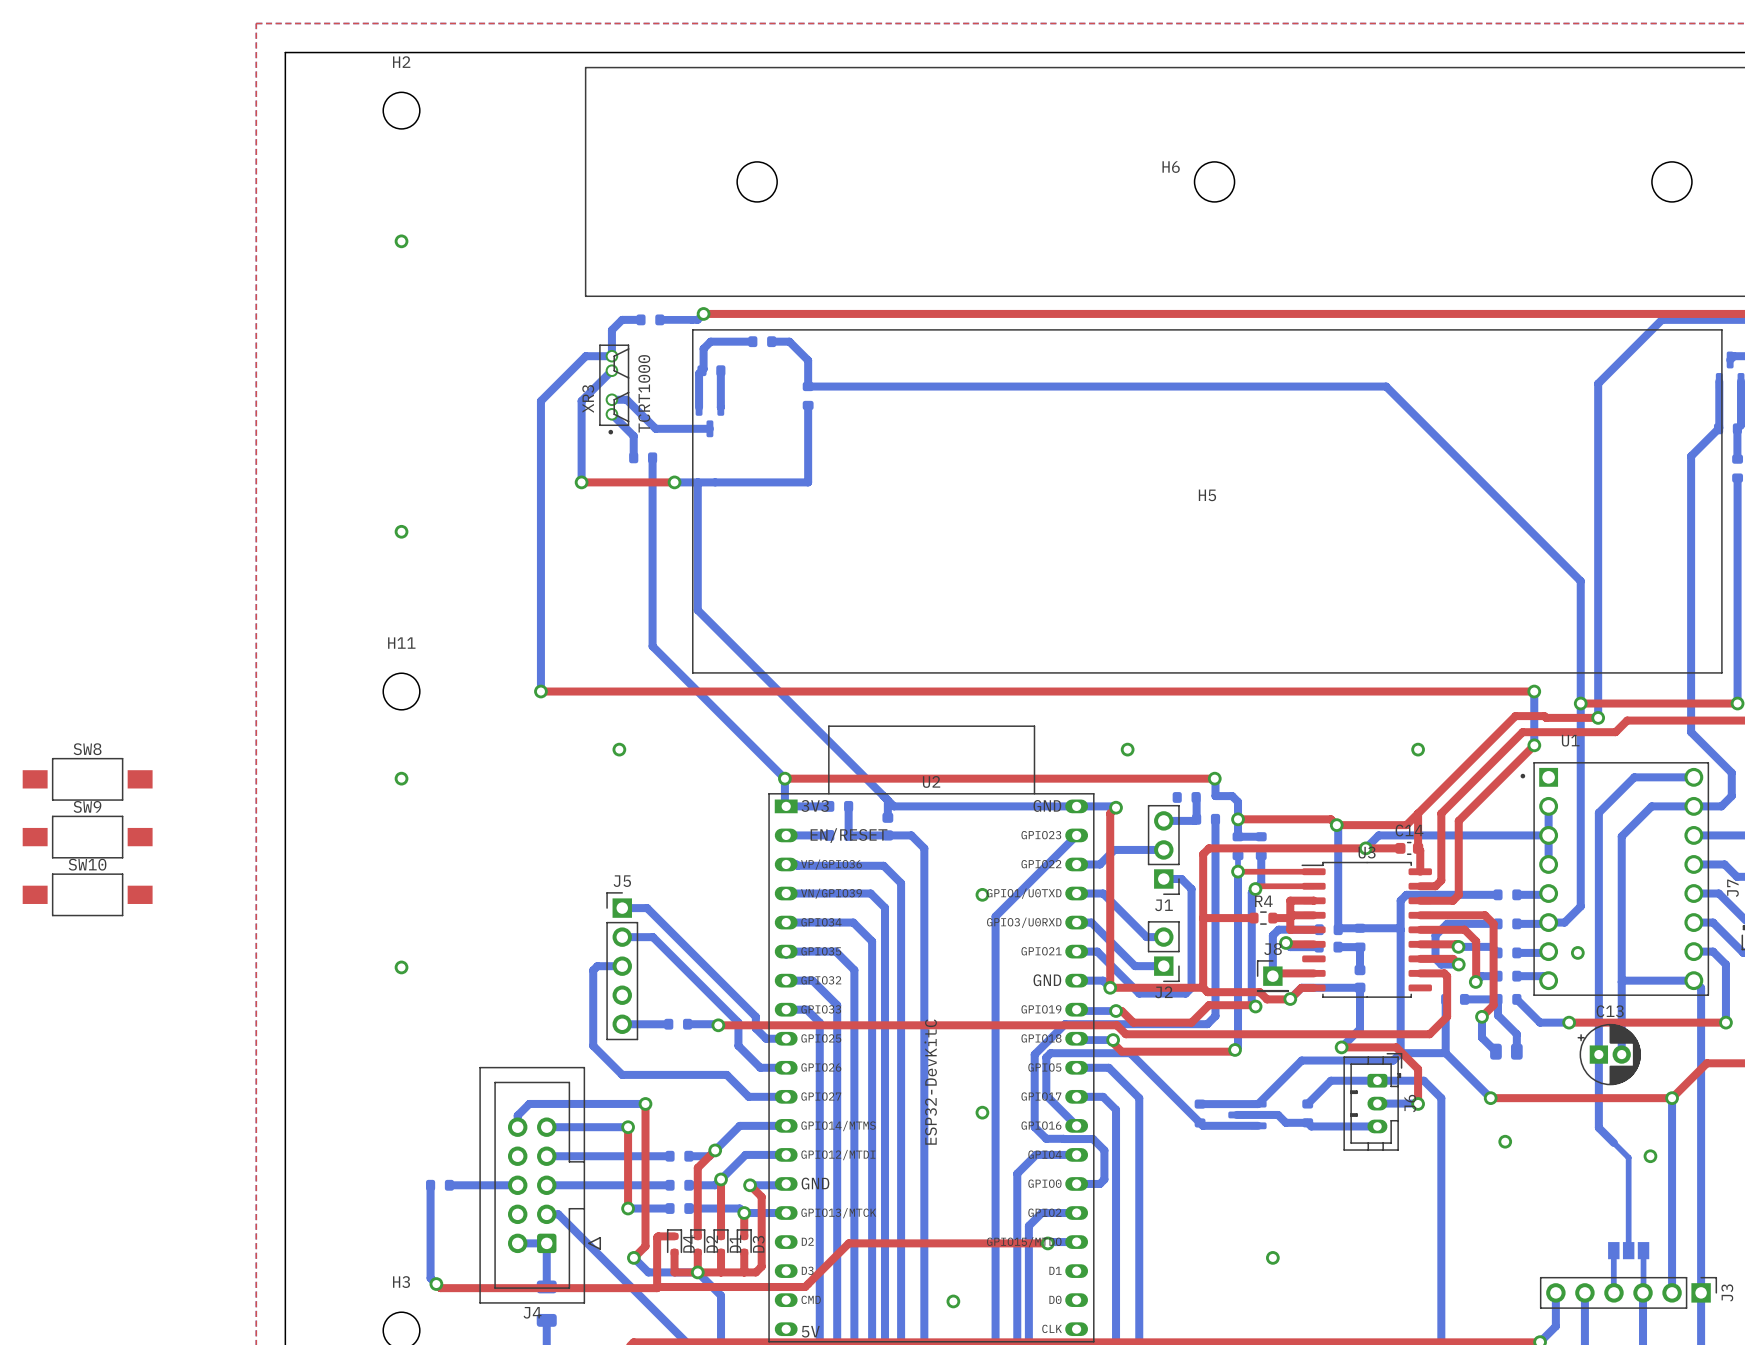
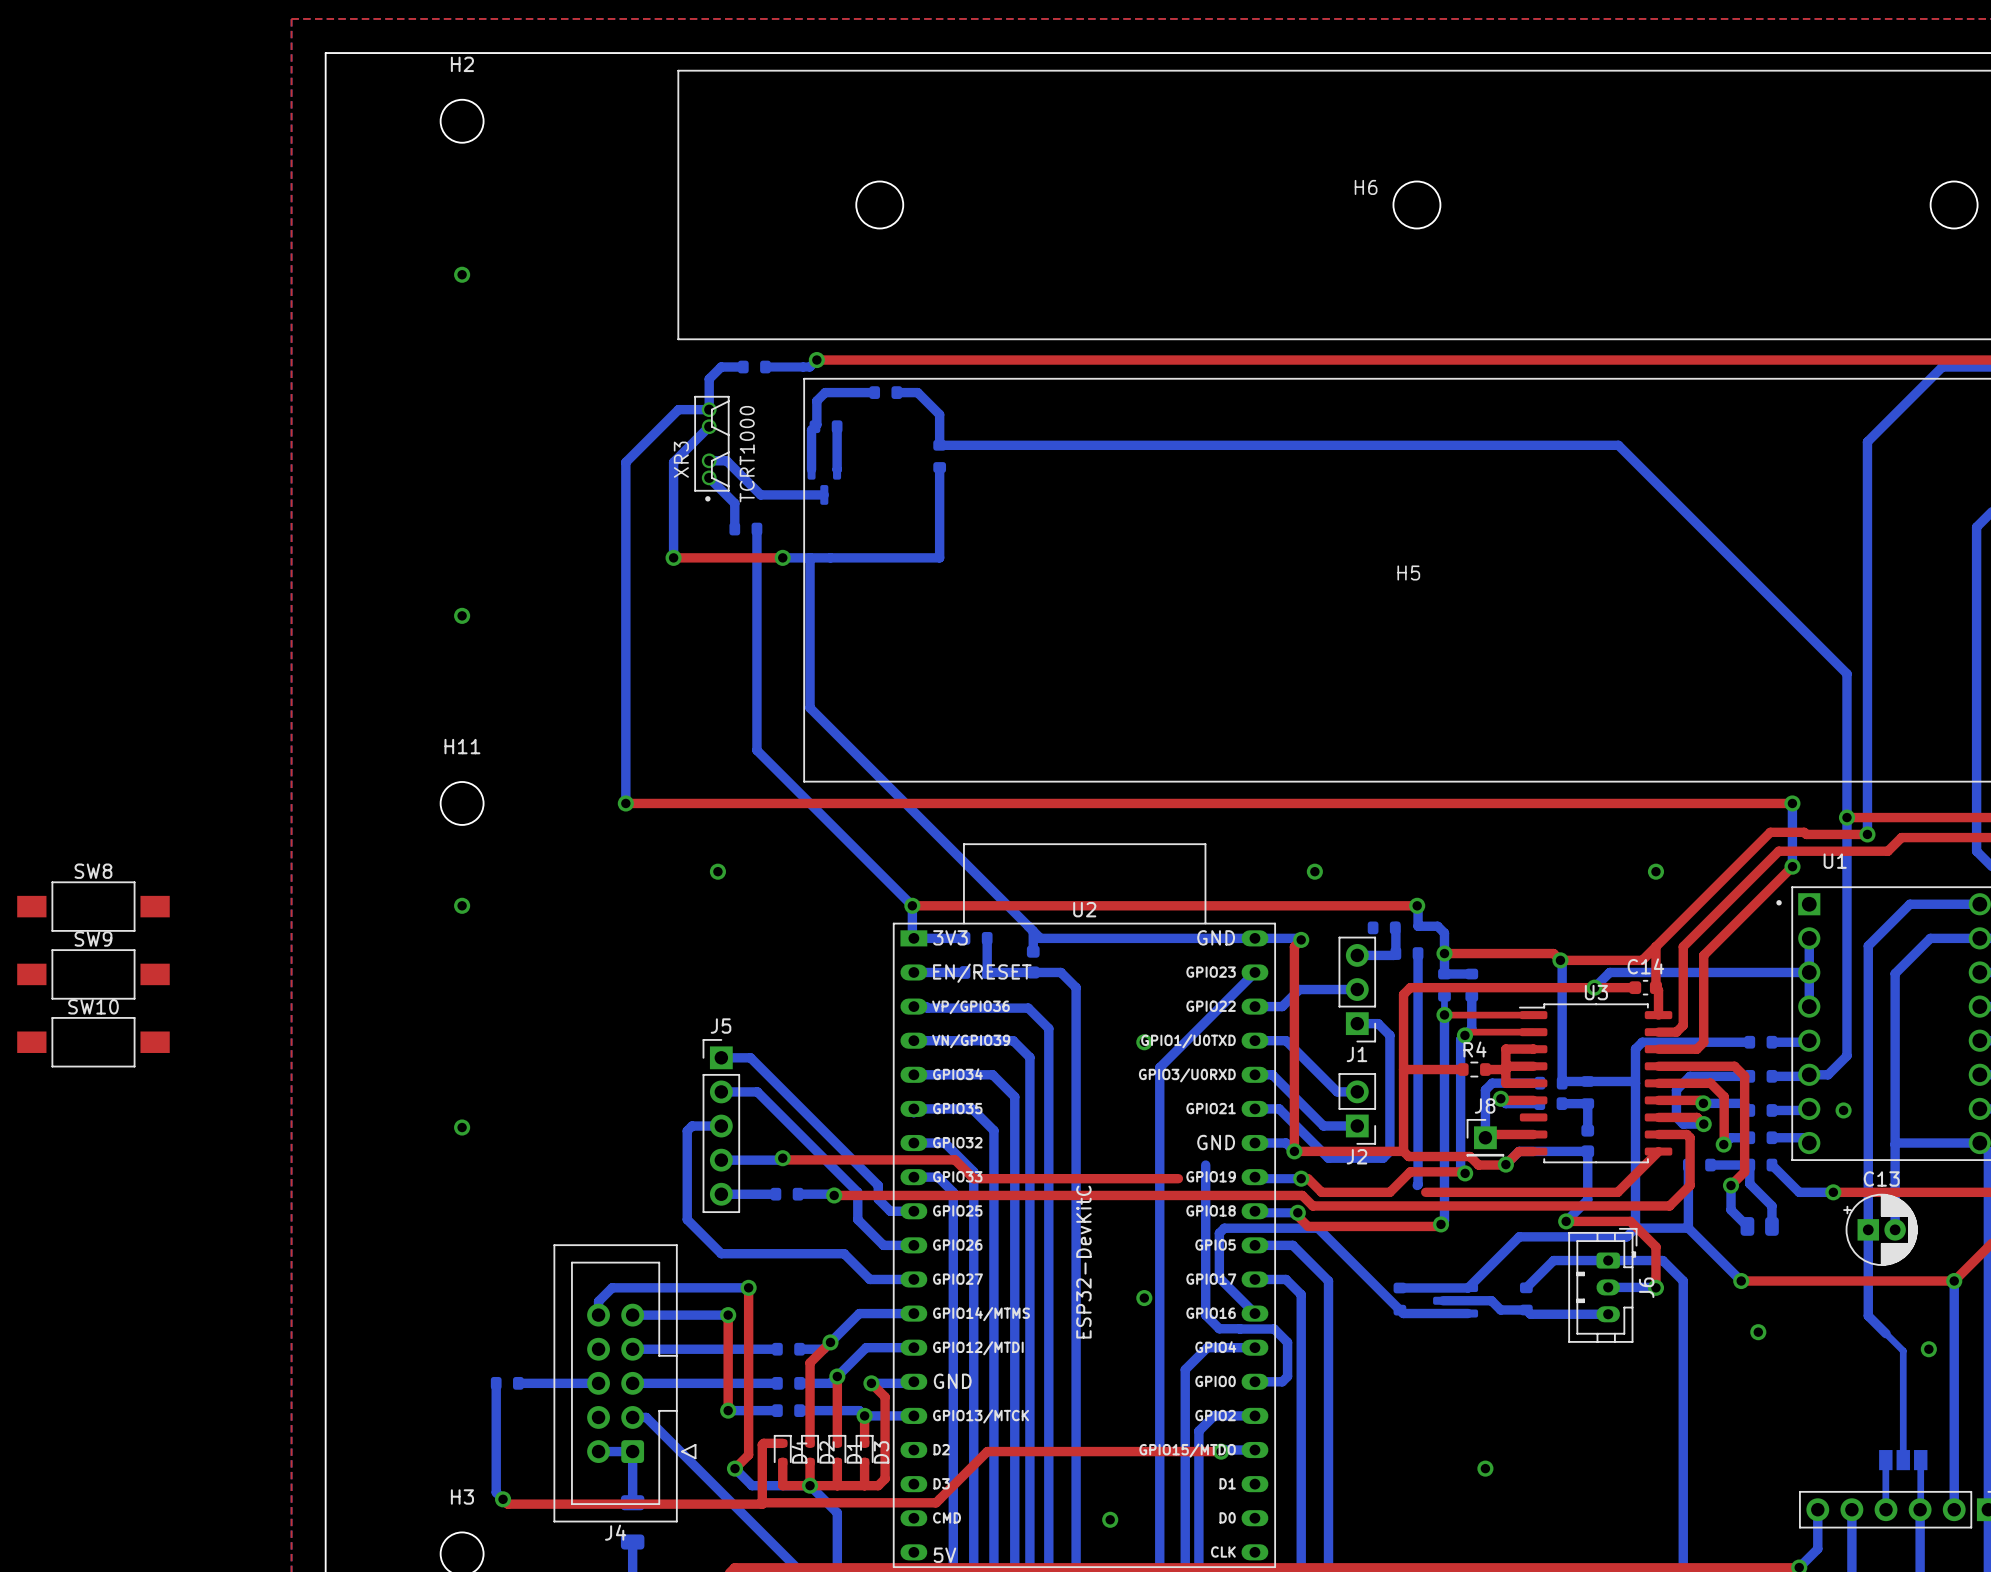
top track: none -> (1658, 1151) (1617, 1192) (1425, 1192)
bottom track: none -> (782, 1158) (780, 1160) (721, 1160)
top track: none -> (782, 1158) (784, 1159) (955, 1159) (973, 1178) (1178, 1178)
via: none -> (782, 1158)
bottom track: (1214, 1016) (1207, 1024) (1065, 1024) (1034, 1054) -> (1205, 1165) (1205, 1229)

